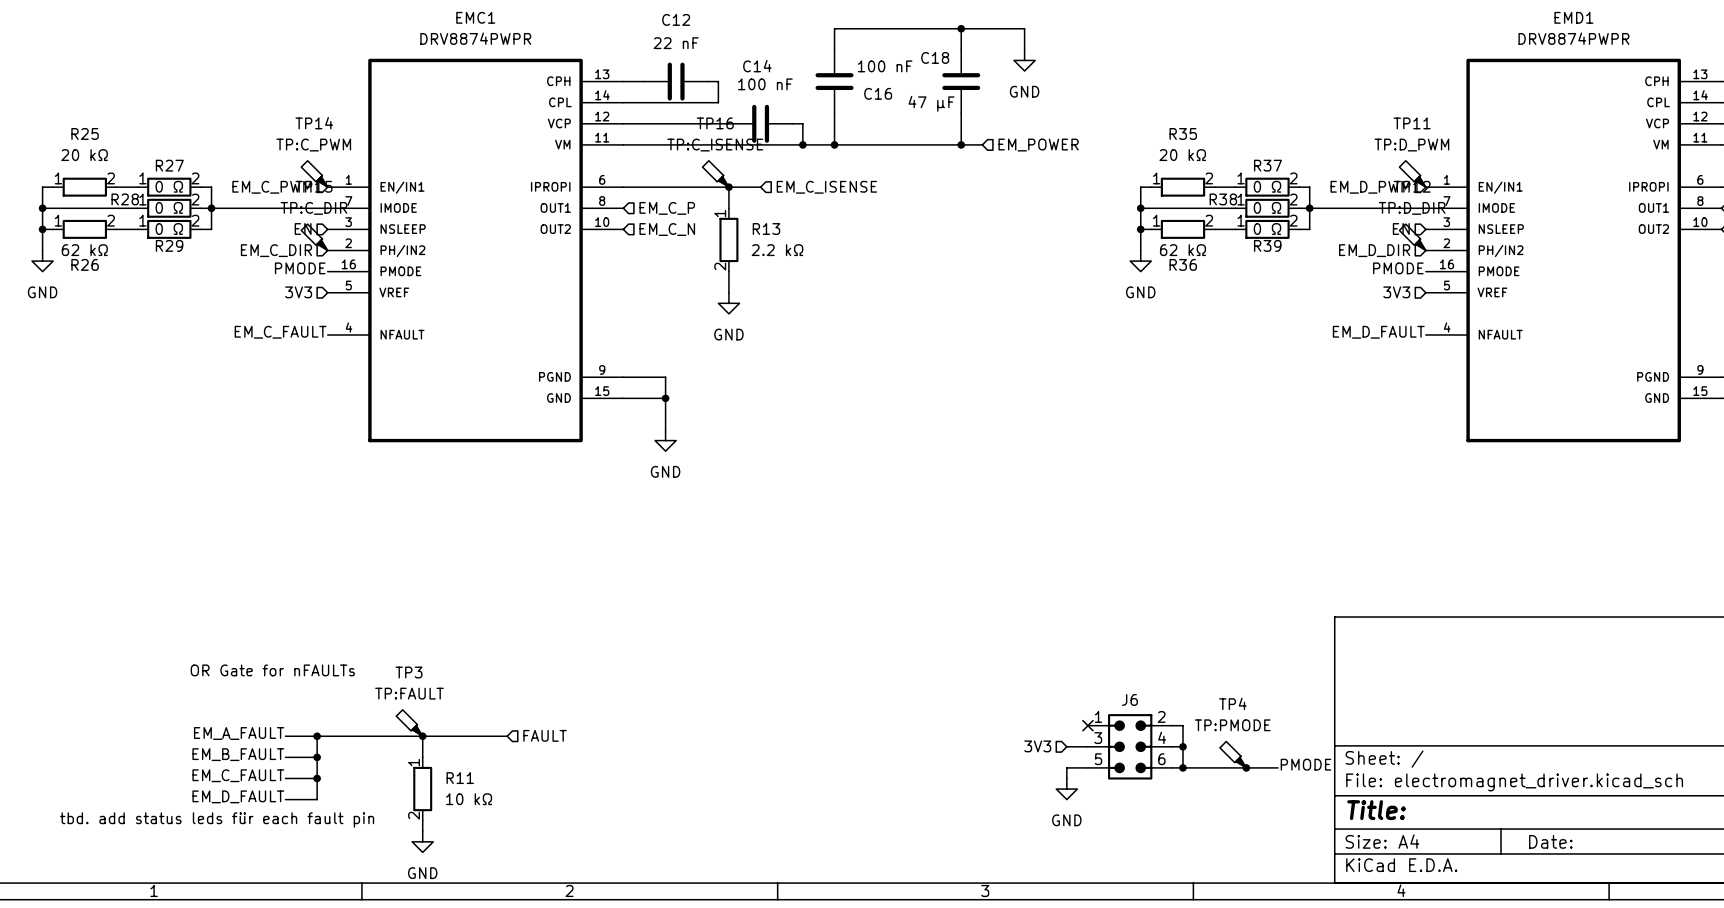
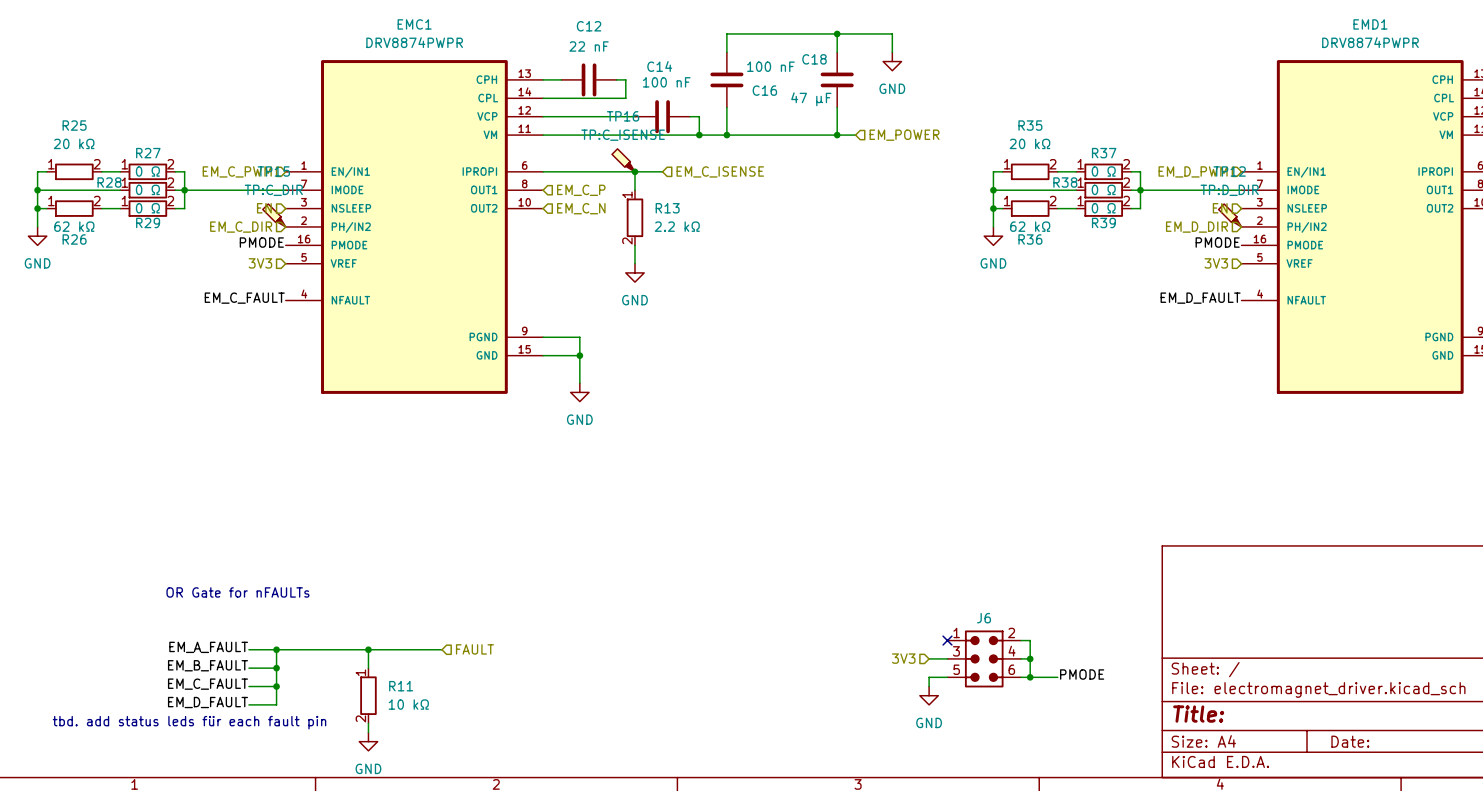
TP14: TP:C_PWM (314, 173) -> none
TP11: TP:D_PWM (1412, 173) -> none
TP3: TP:FAULT (409, 723) -> none
TP4: TP:PMODE (1233, 754) -> none
label position: PMODE (1306, 764) -> PMODE (1082, 674)
wire: (1214, 767) (1278, 767) -> none
junction: (1246, 767) -> none

